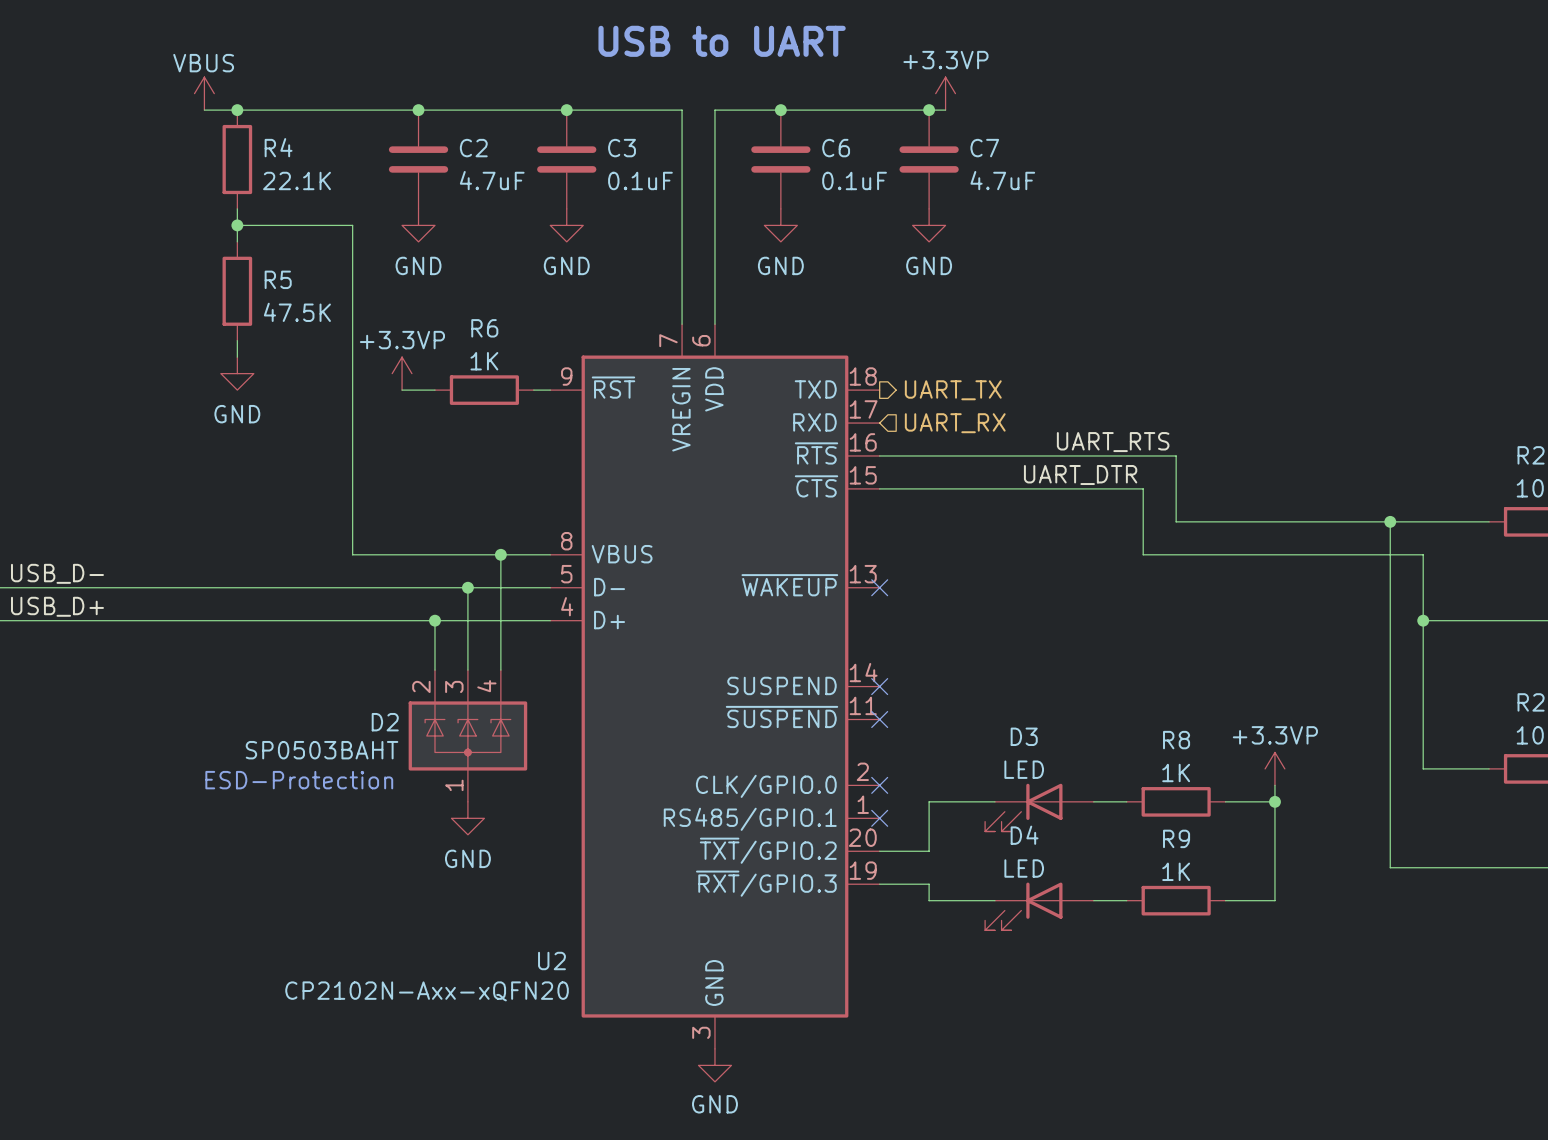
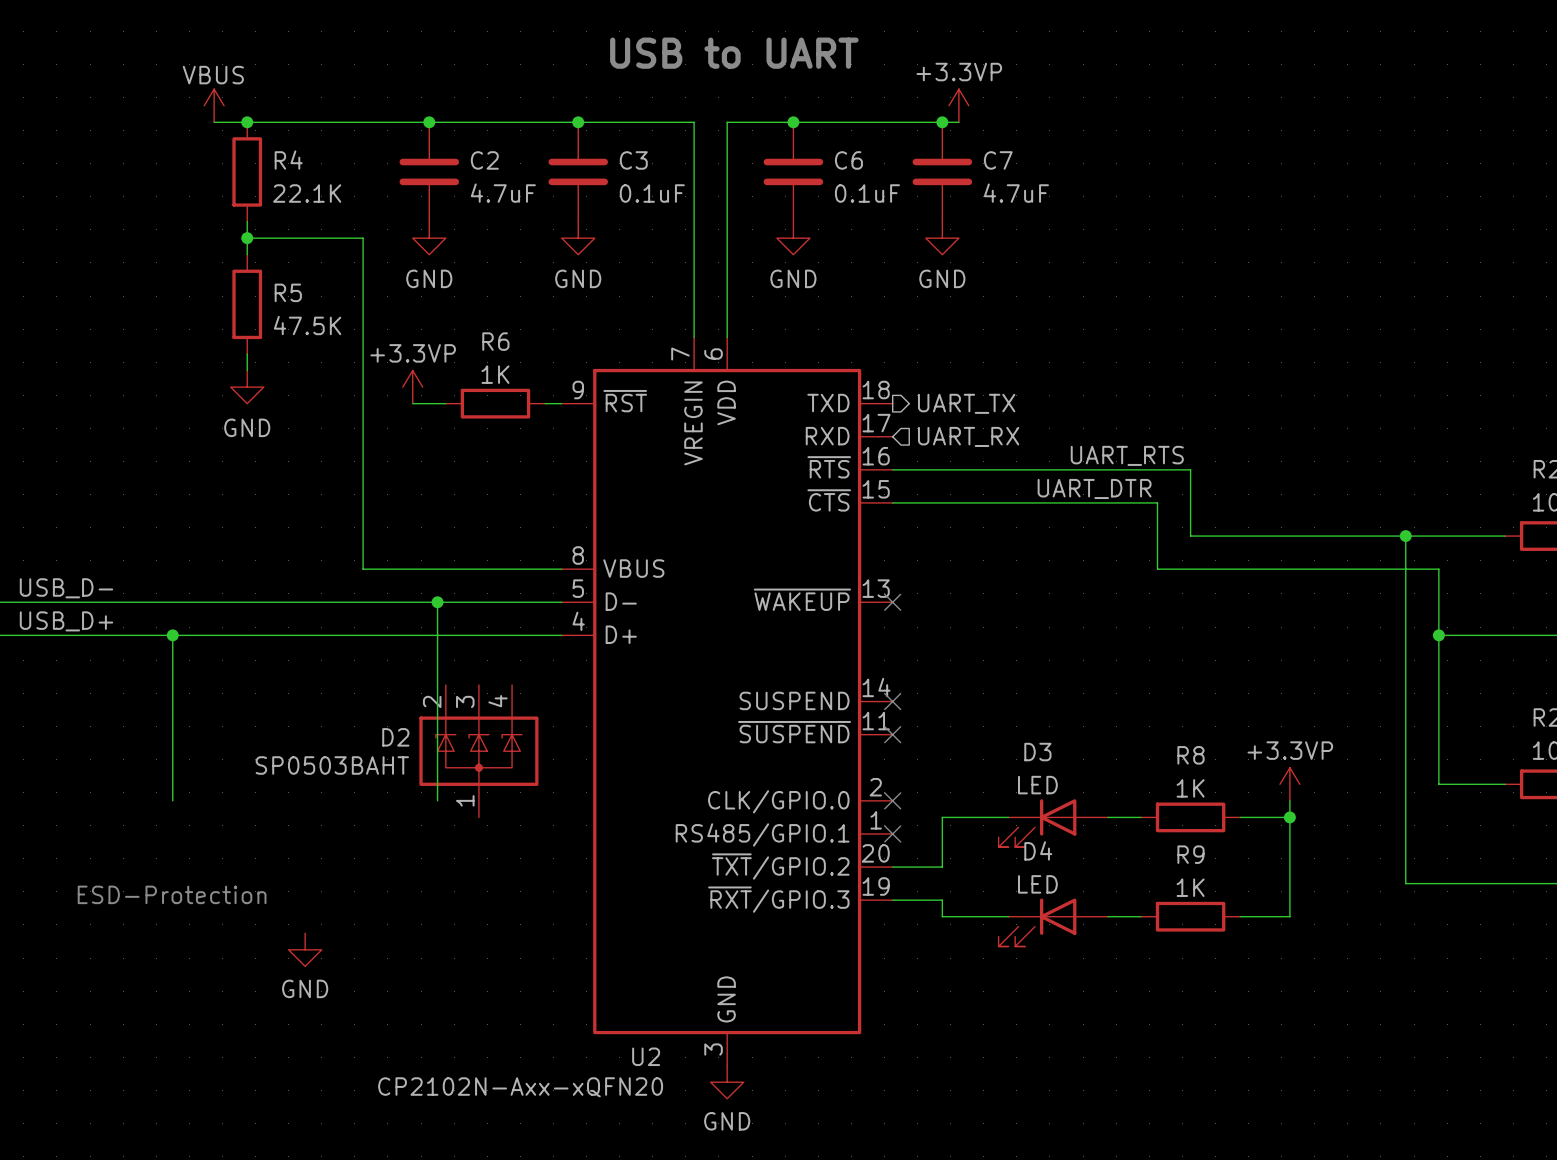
wire: (500, 554) (500, 670) -> none
junction: (500, 554) -> none
wire: none -> (437, 602) (437, 800)
junction: none -> (437, 602)
wire: (467, 587) (467, 670) -> none
junction: (467, 587) -> none
wire: none -> (172, 635) (172, 800)
junction: none -> (172, 635)
wire: (434, 620) (434, 670) -> none
junction: (434, 620) -> none
text position: ESD-Protection (299, 780) -> ESD-Protection (172, 894)
power symbol: GND (467, 818) -> none
power symbol: none -> GND (305, 949)
U2 name position: U2 (551, 961) -> U2 (646, 1056)
U2 value position: CP2102N-Axx-xQFN20 (427, 991) -> CP2102N-Axx-xQFN20 (520, 1087)

